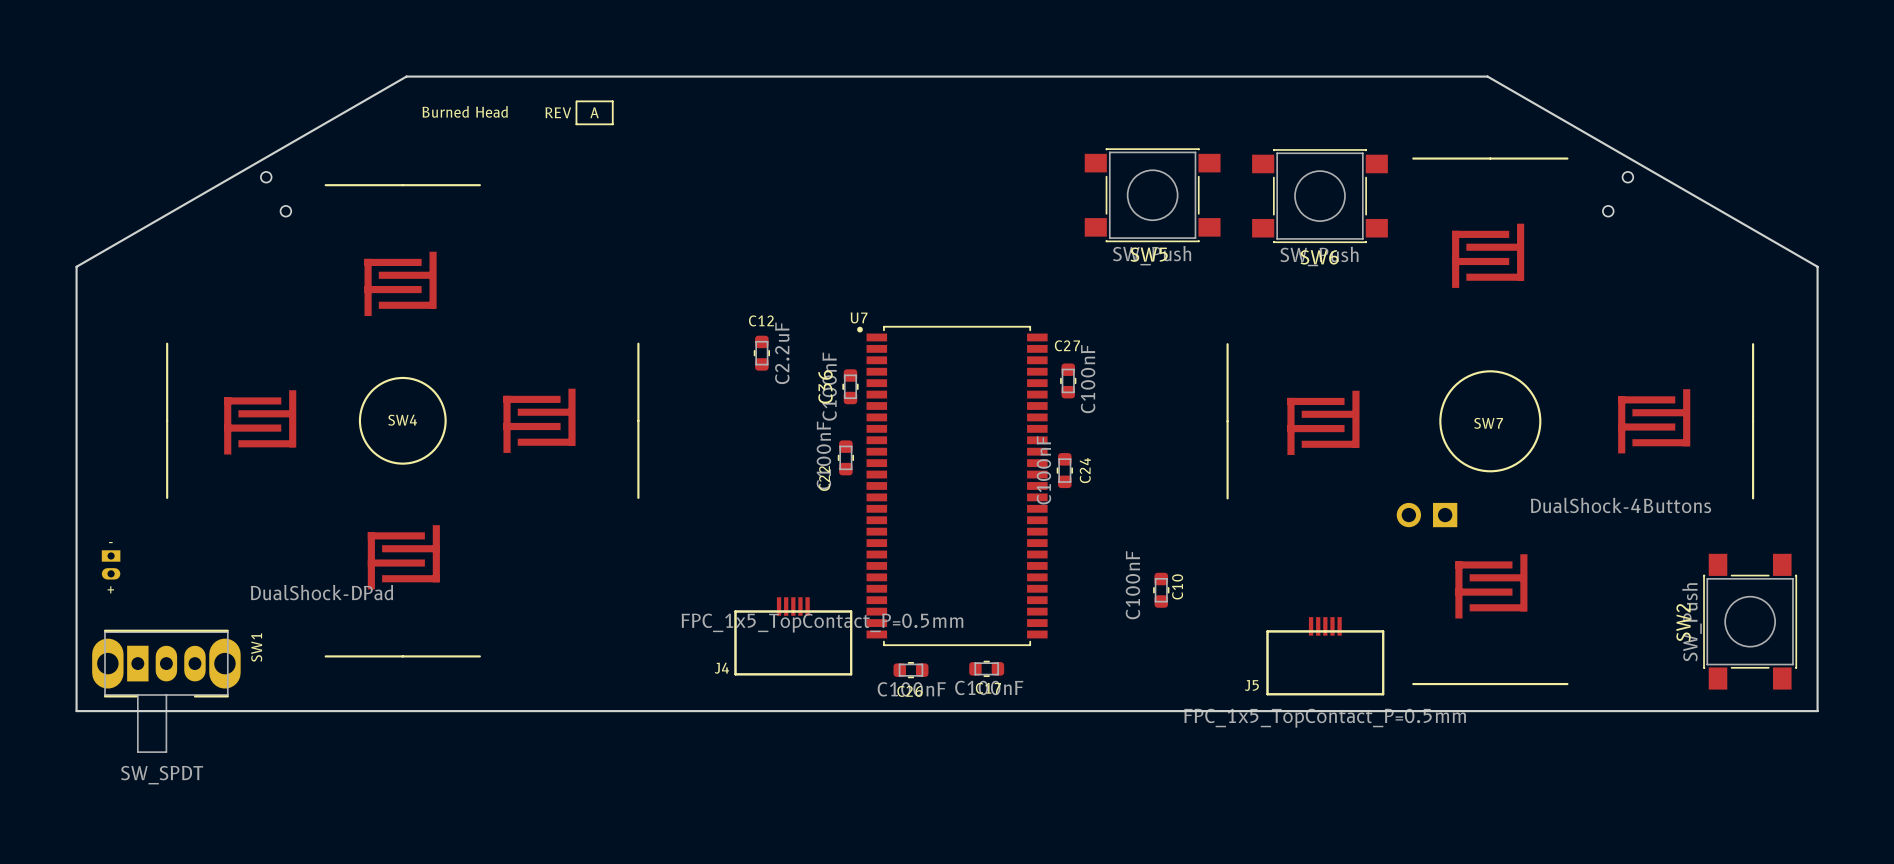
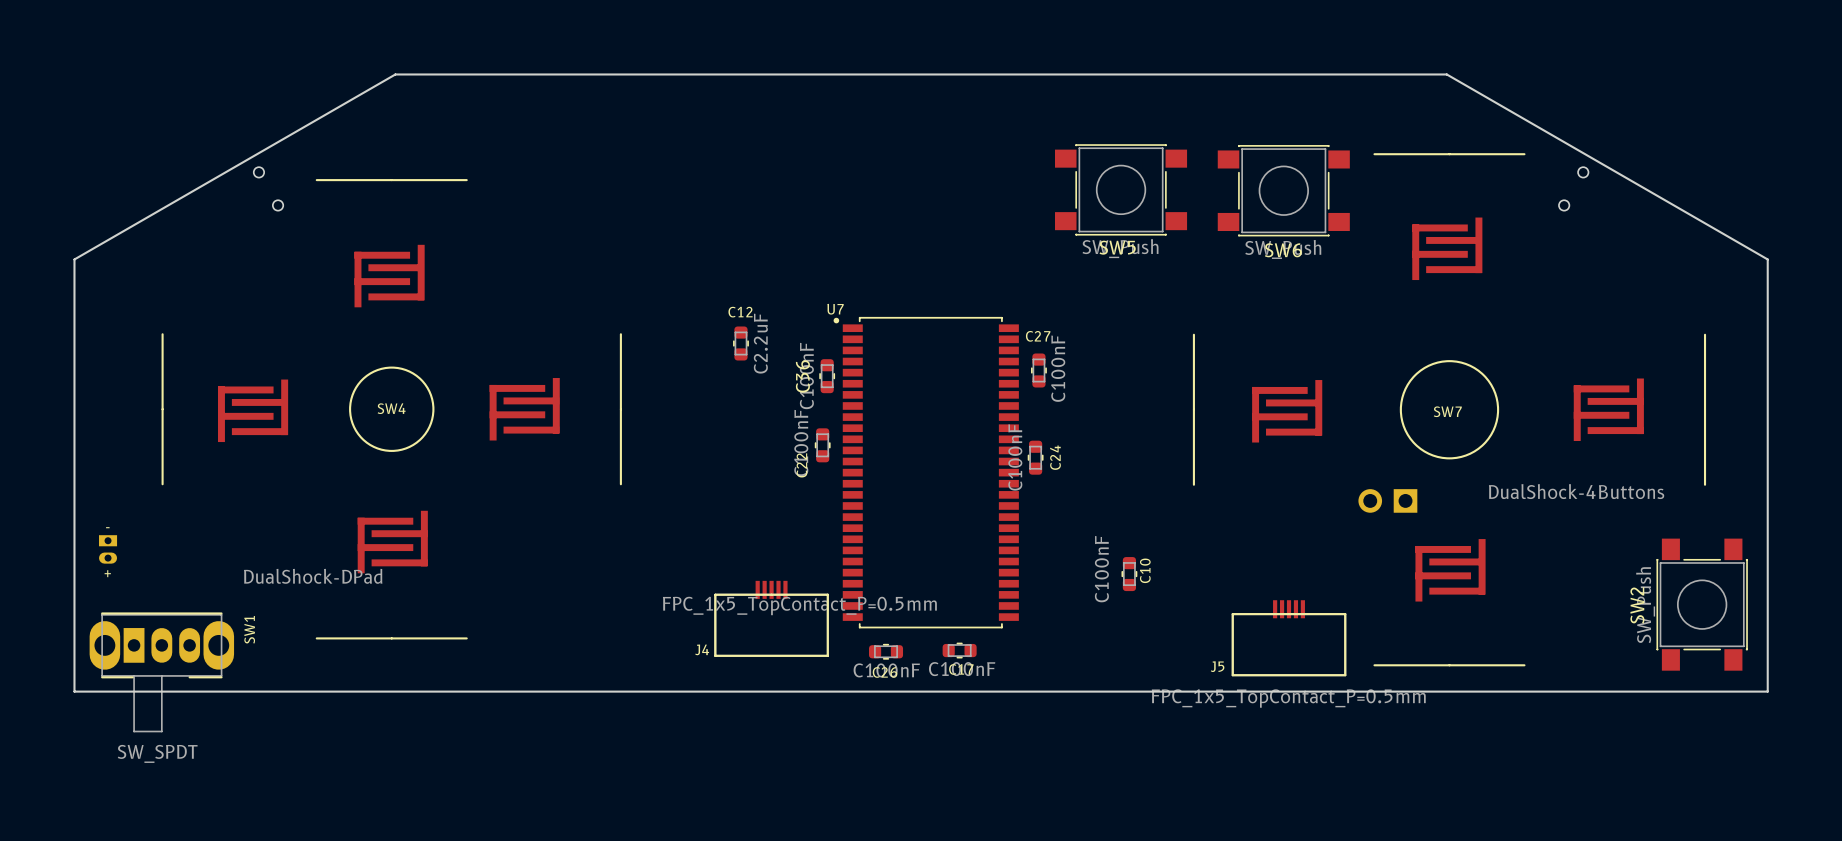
line: (576, 101) (612, 101) (612, 124) (576, 124) (576, 101) -> none
text: Burned Head (465, 111) -> none
text: REV (558, 112) -> none
text: A (594, 112) -> none

